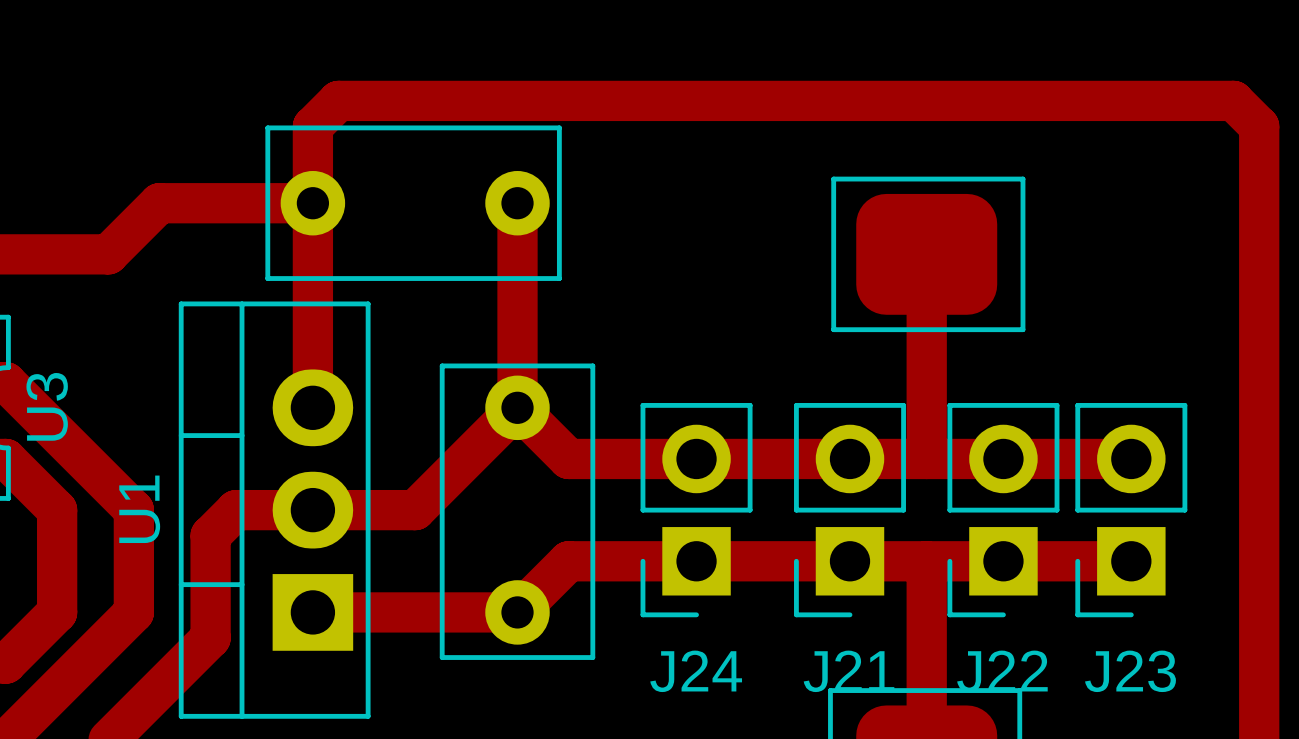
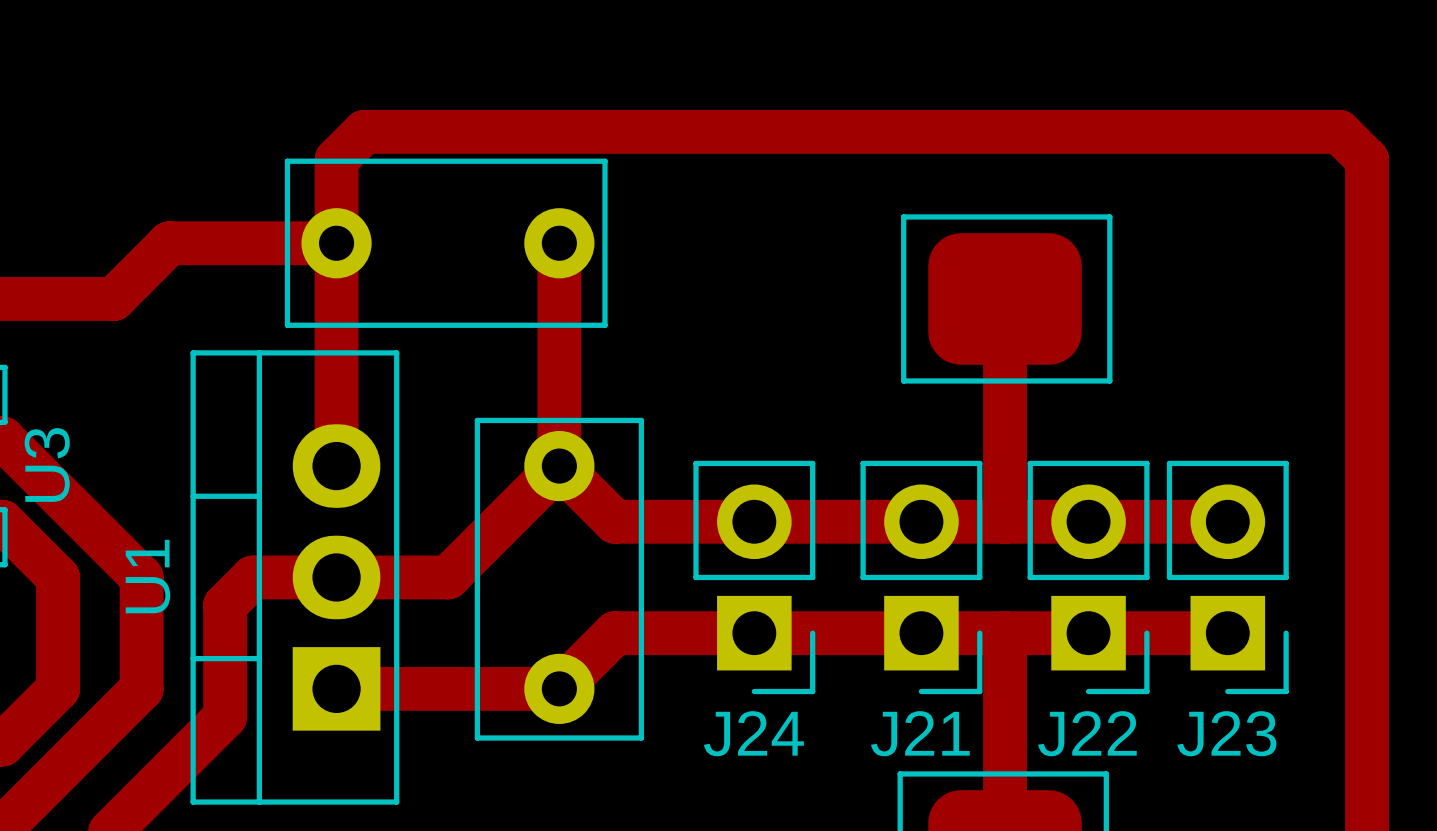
J24 footprint: [640, 402, 753, 618] -> [693, 460, 816, 695]
J21 footprint: [794, 402, 906, 618] -> [860, 460, 983, 695]
J22 footprint: [947, 402, 1060, 618] -> [1027, 460, 1150, 695]
J23 footprint: [1075, 402, 1188, 618] -> [1166, 460, 1289, 695]

